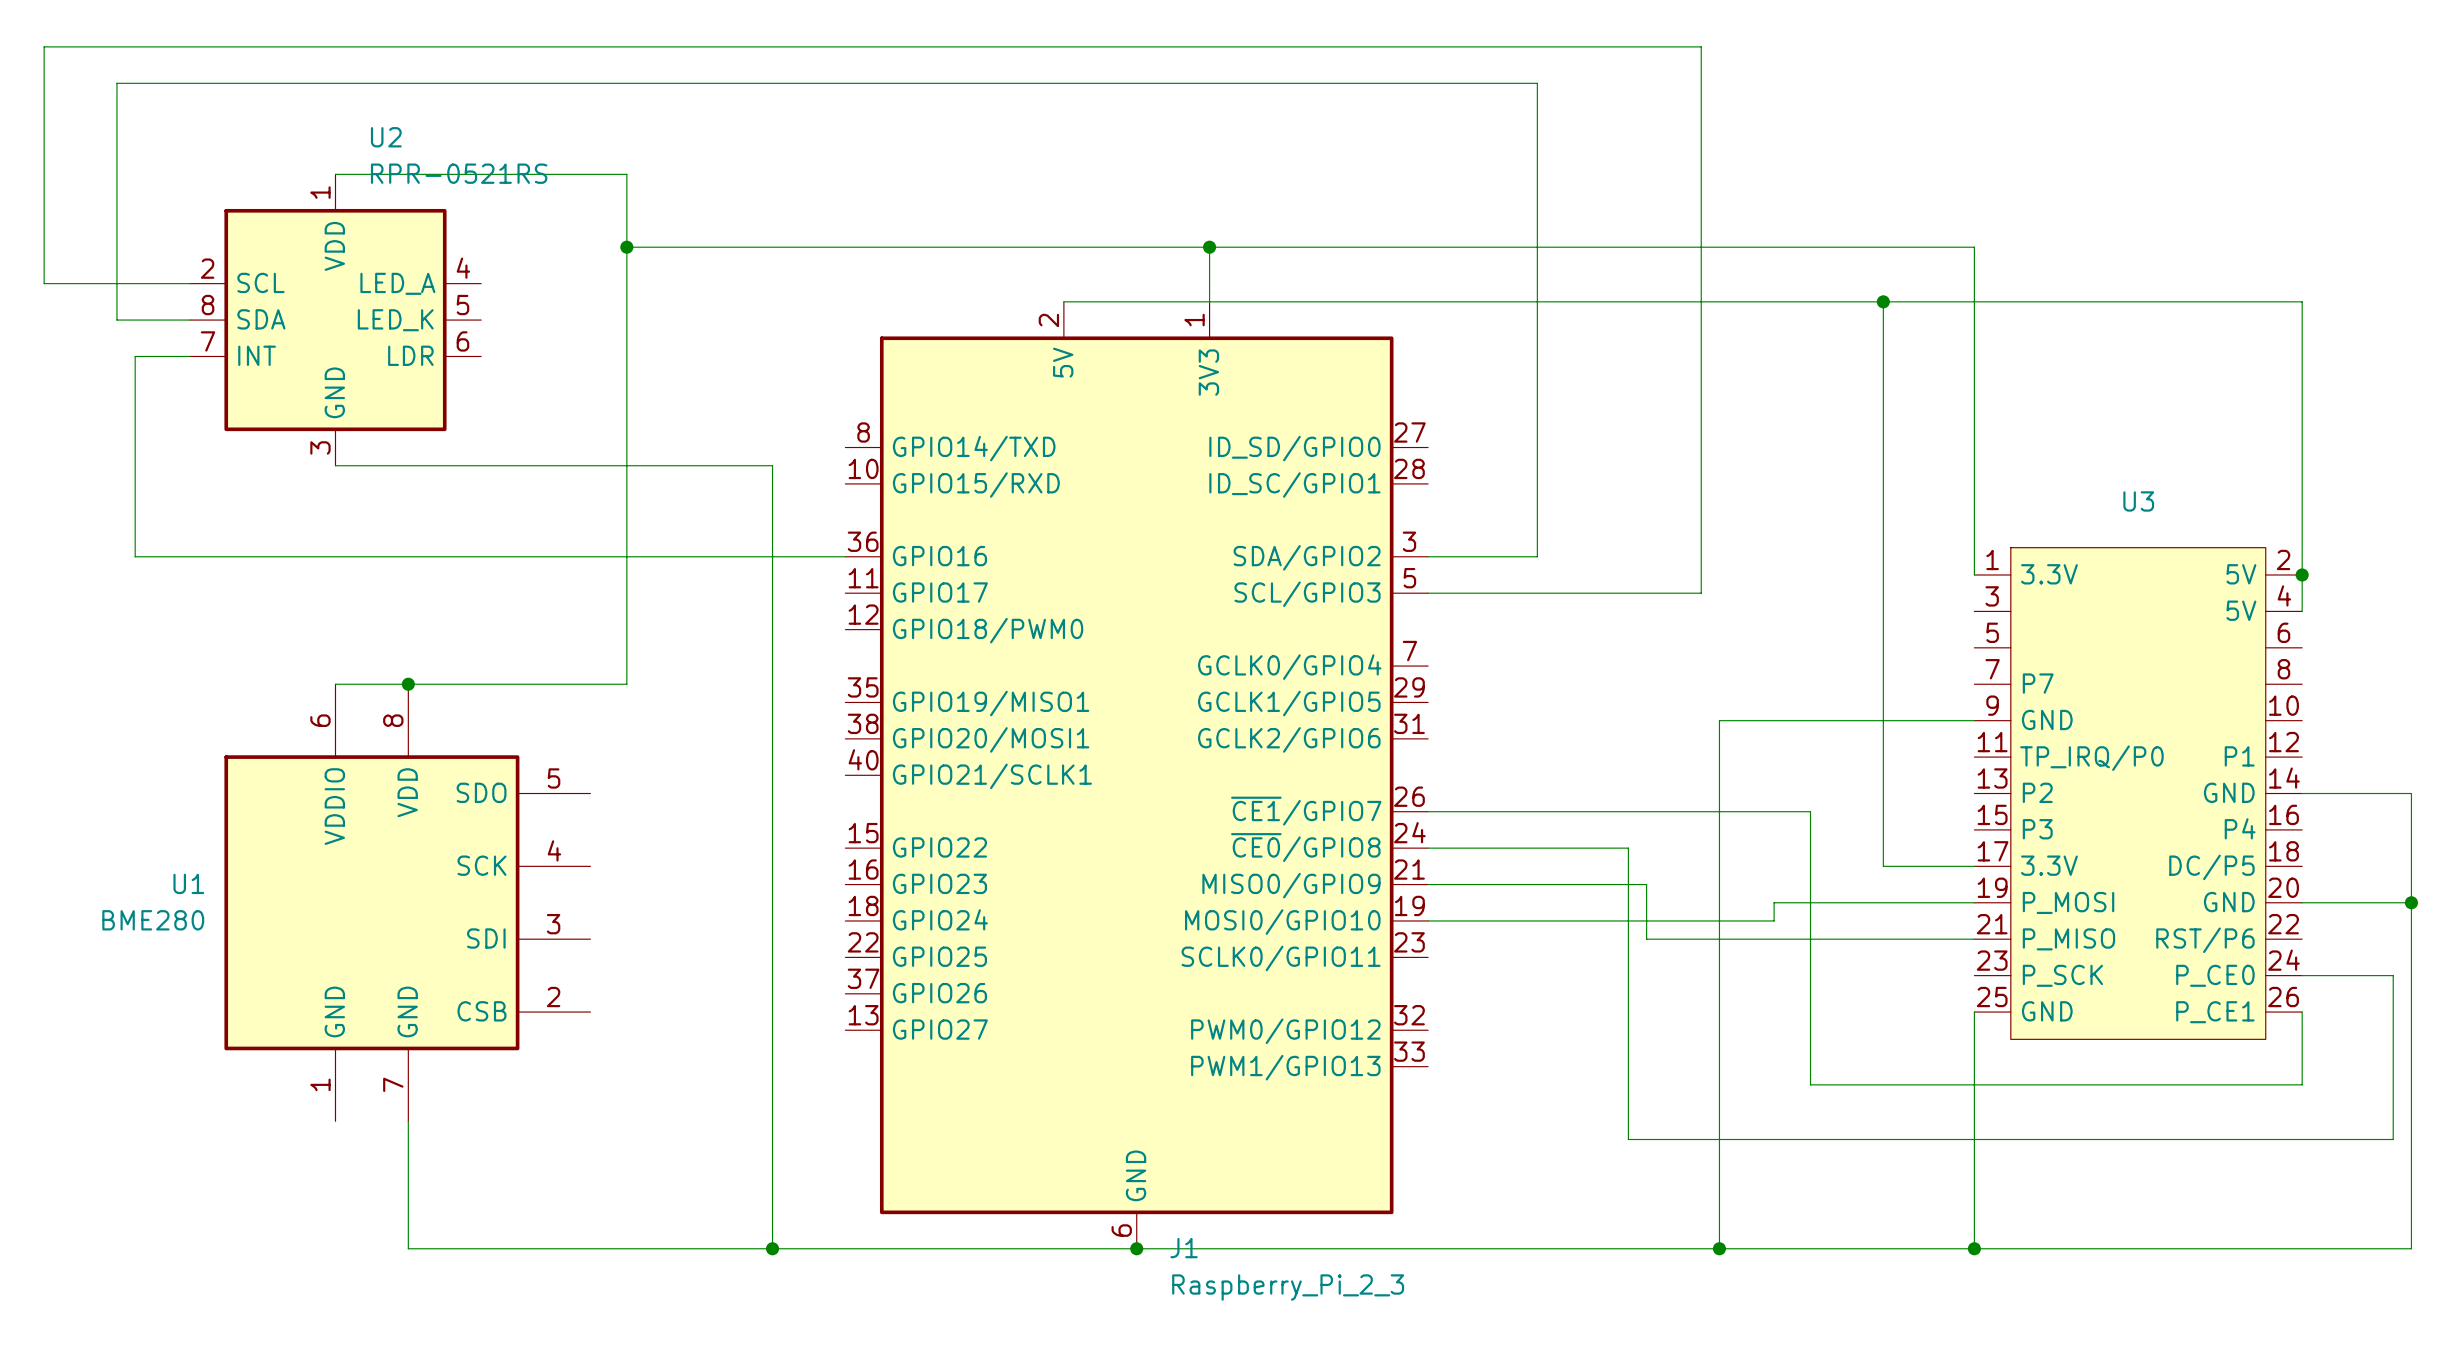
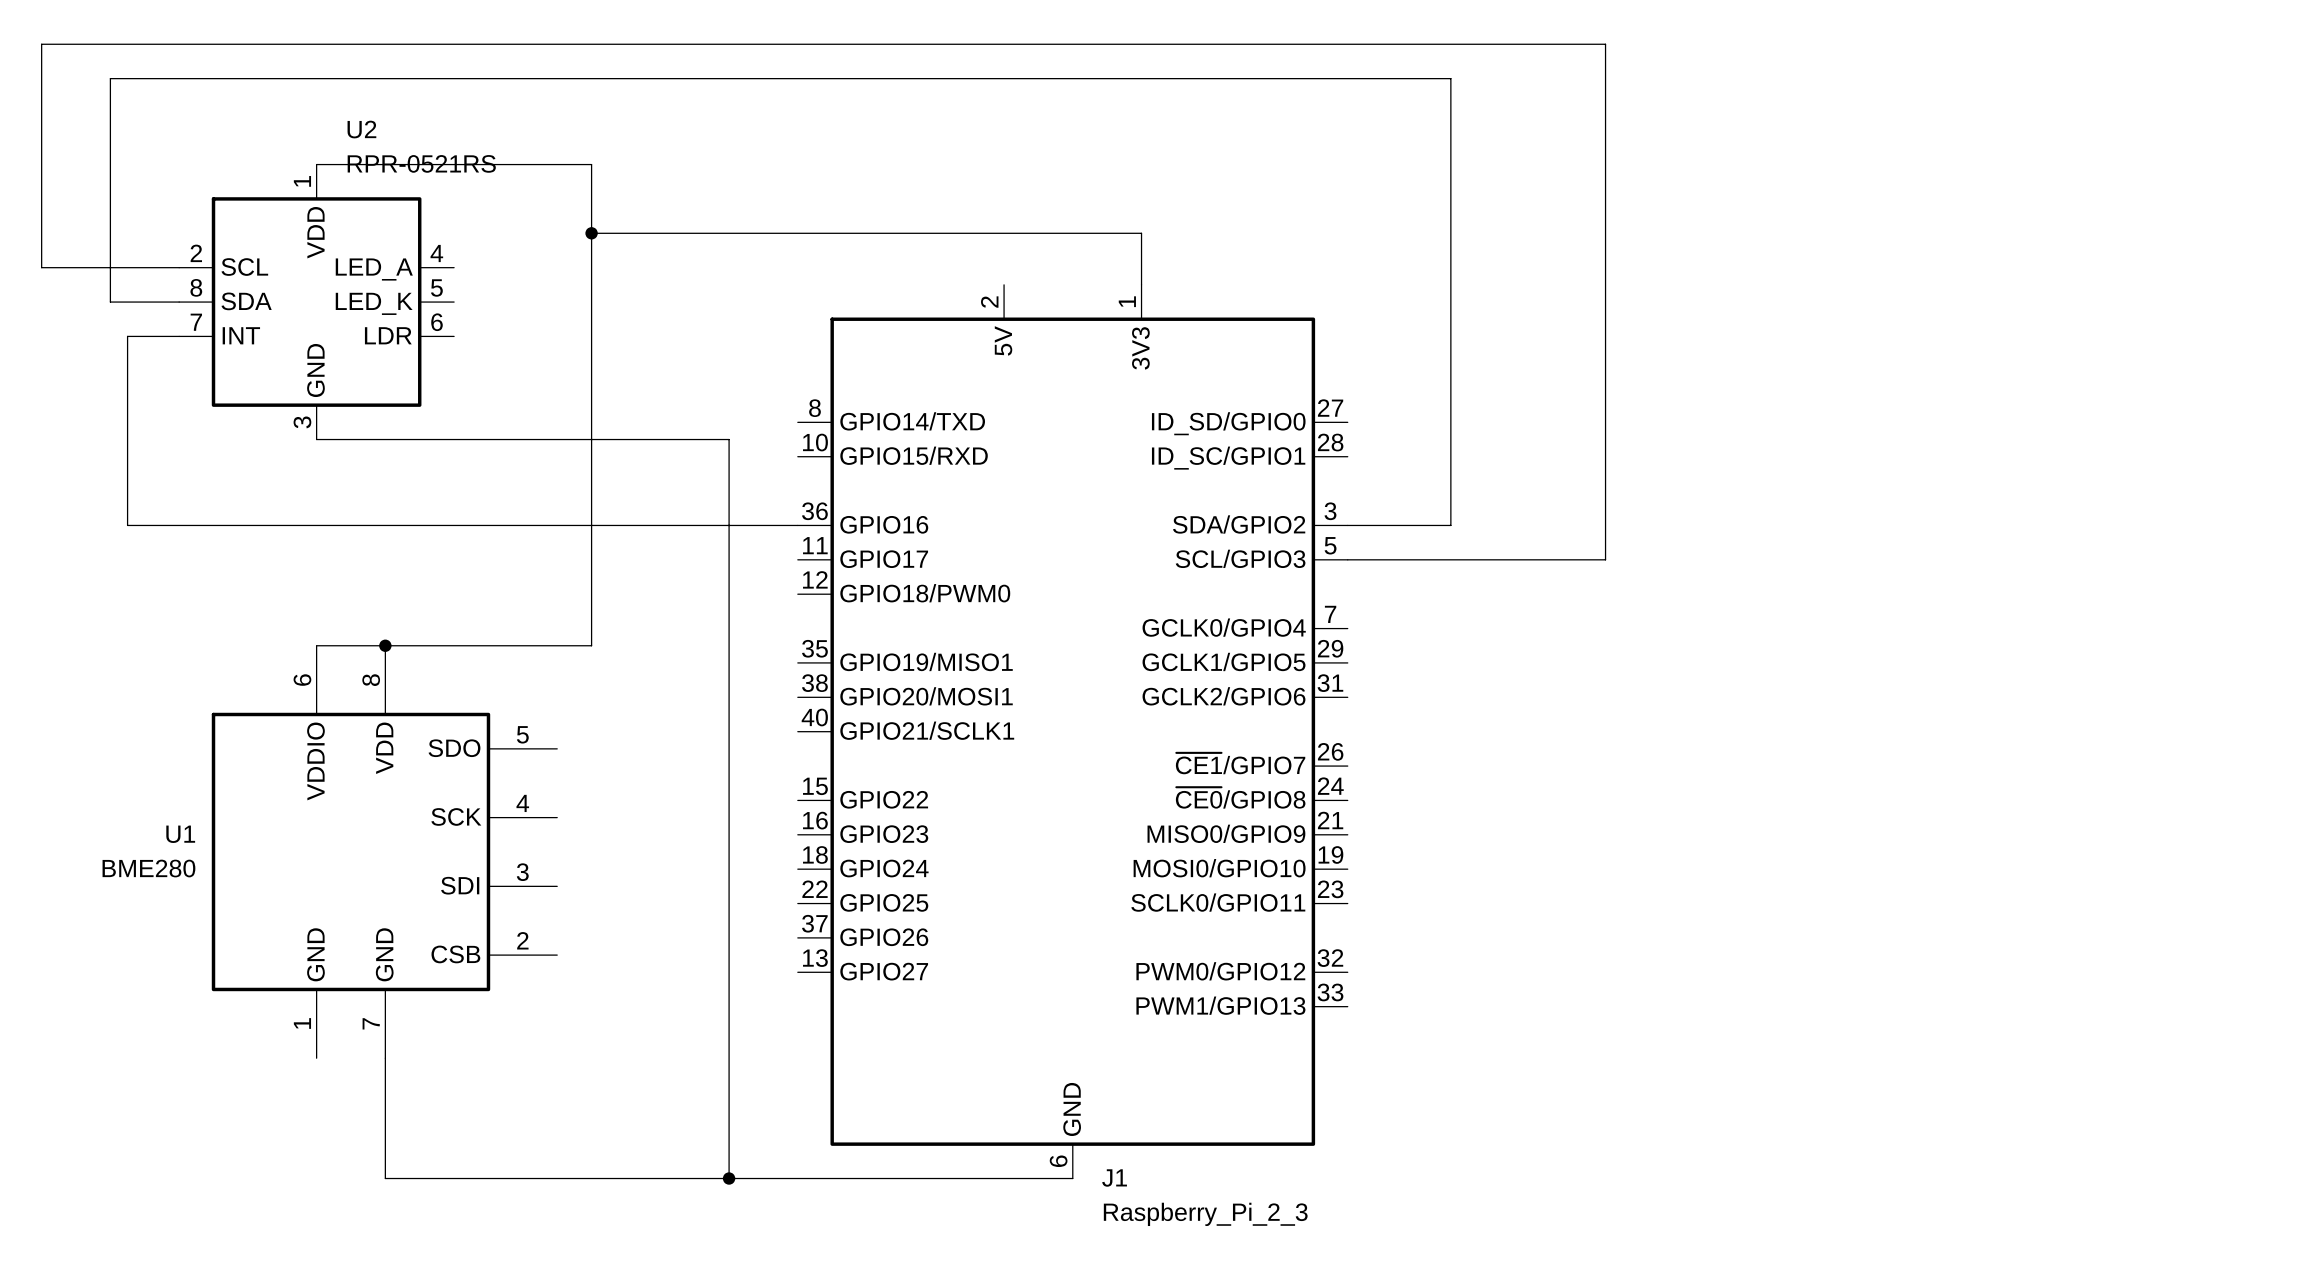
wire: (1209, 247) (1974, 247) (1974, 574) -> none
junction: (1209, 247) -> none
wire: (1063, 301) (2302, 301) (2302, 611) -> none
wire: (1883, 301) (1883, 866) (1974, 866) -> none
junction: (1883, 301) -> none
junction: (2302, 574) -> none
wire: (1974, 720) (1719, 720) (1719, 1248) -> none
U3: (2138, 793) -> none
wire: (2302, 793) (2411, 793) (2411, 1248) (1136, 1248) -> none
wire: (1428, 811) (1810, 811) (1810, 1084) (2302, 1084) (2302, 1012) -> none
wire: (1428, 848) (1628, 848) (1628, 1139) (2393, 1139) (2393, 975) (2302, 975) -> none
wire: (1428, 884) (1646, 884) (1646, 939) (1974, 939) -> none
wire: (1974, 902) (1774, 902) (1774, 920) (1428, 920) -> none
wire: (2302, 902) (2411, 902) -> none
junction: (2411, 902) -> none
wire: (1974, 1012) (1974, 1248) -> none
junction: (1136, 1248) -> none
junction: (1719, 1248) -> none
junction: (1974, 1248) -> none

